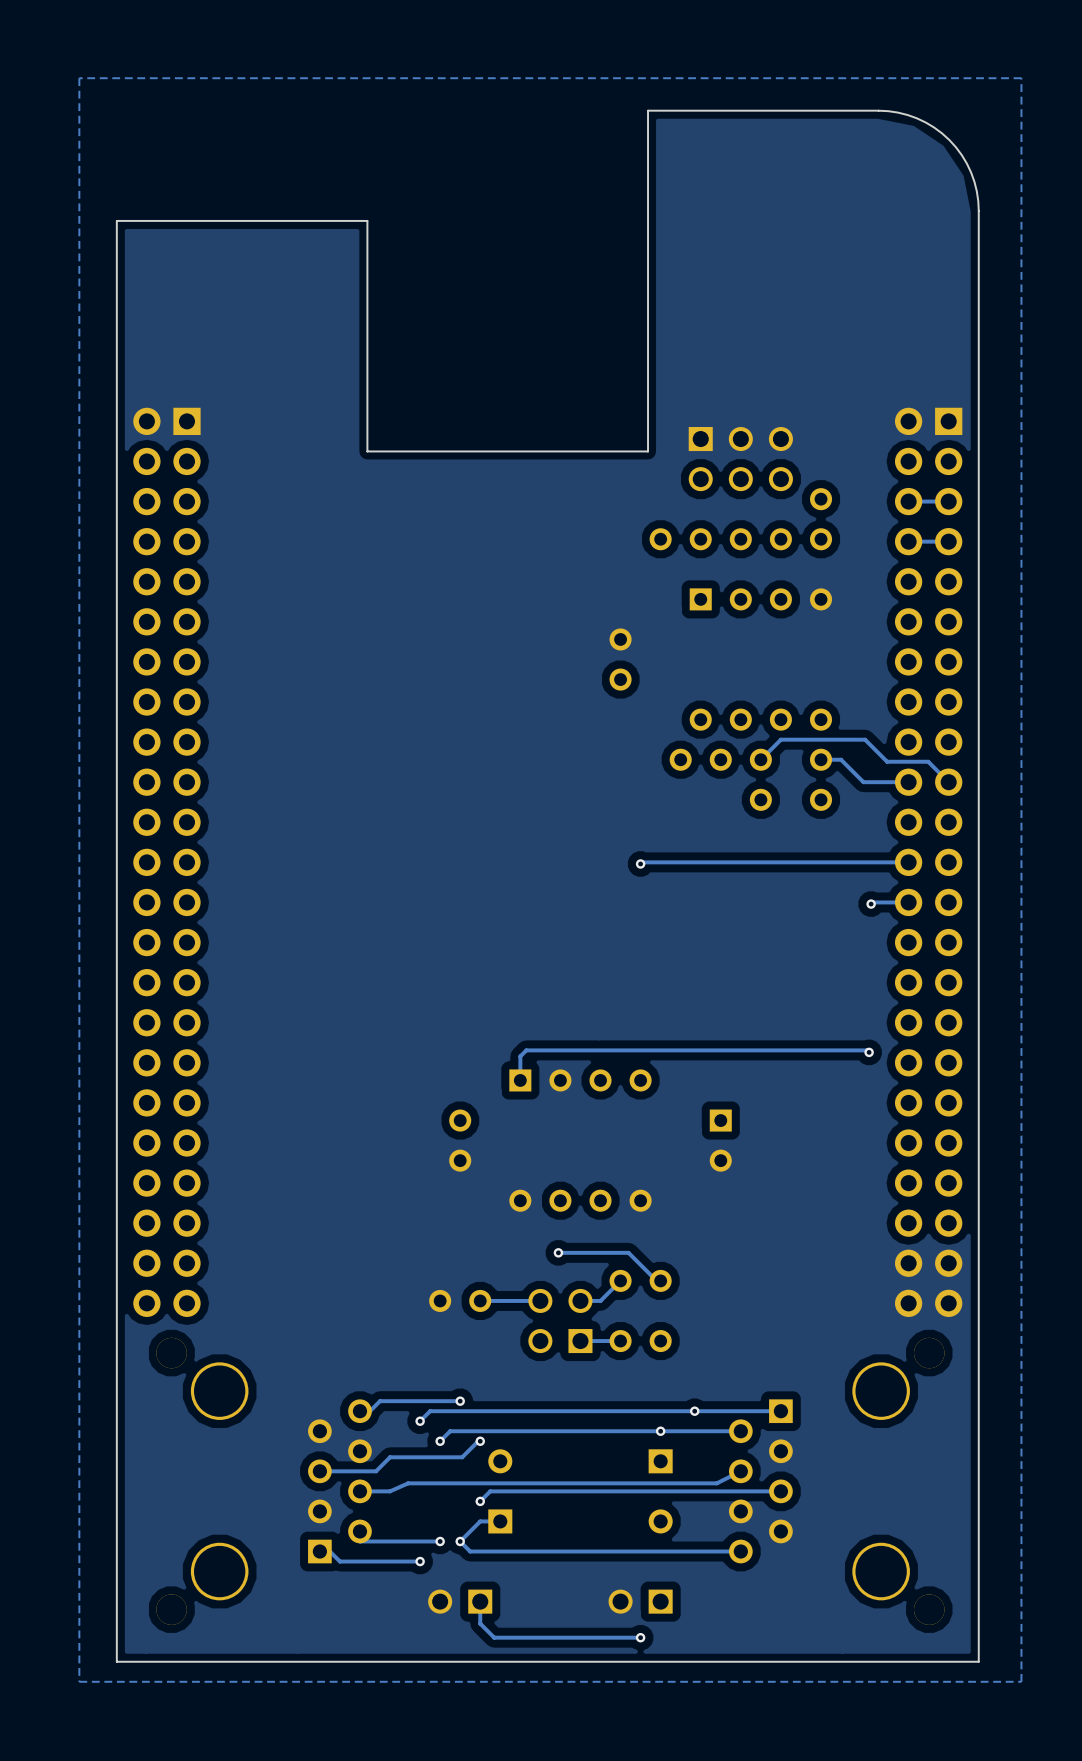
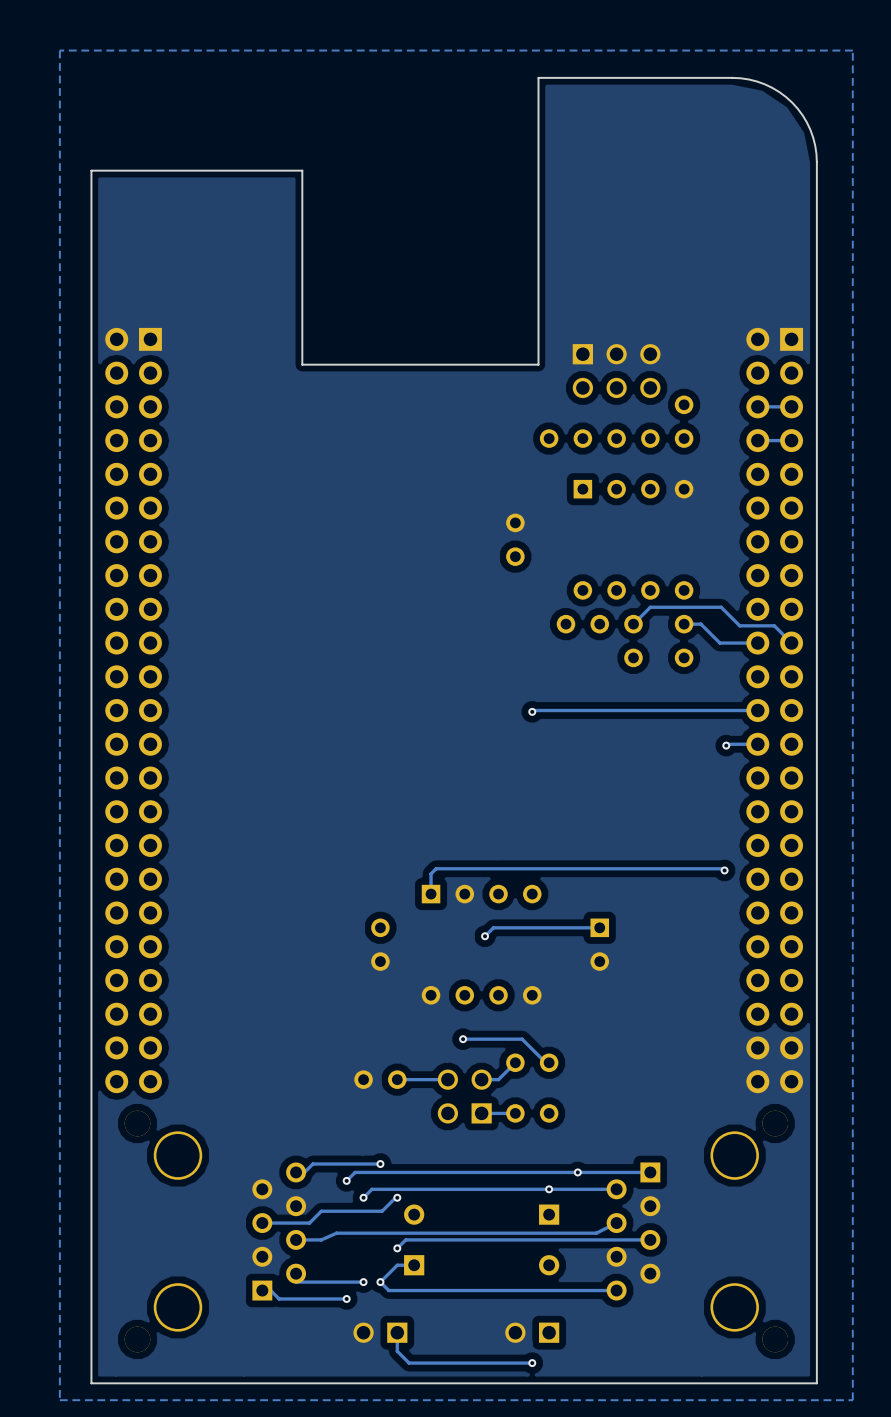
track: none -> (599, 927) (493, 927) (485, 936)
via: none -> (485, 936)

